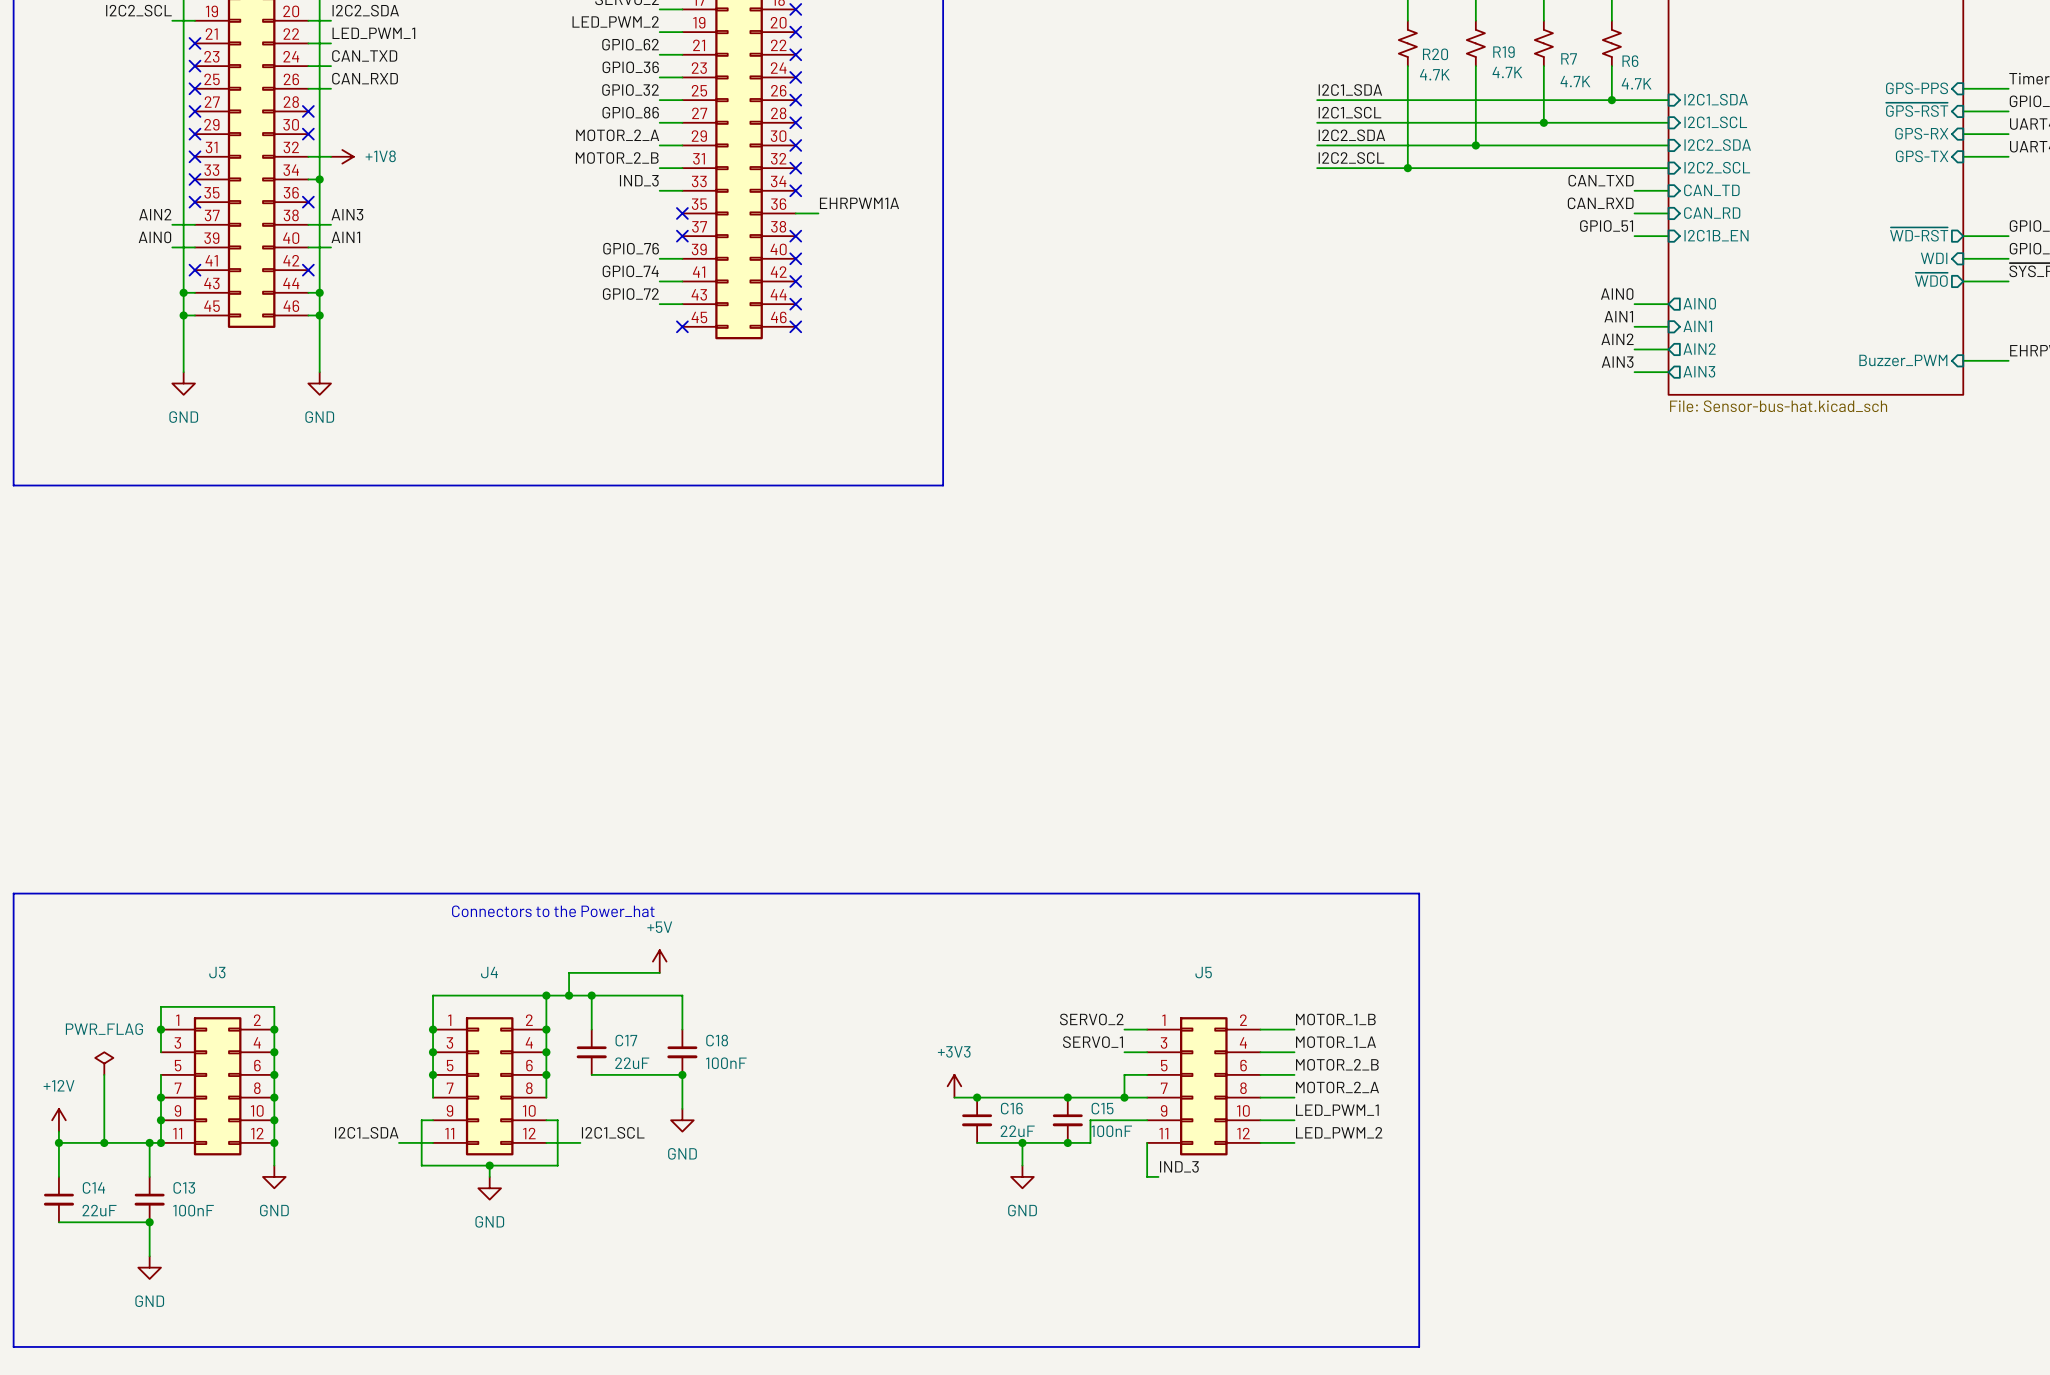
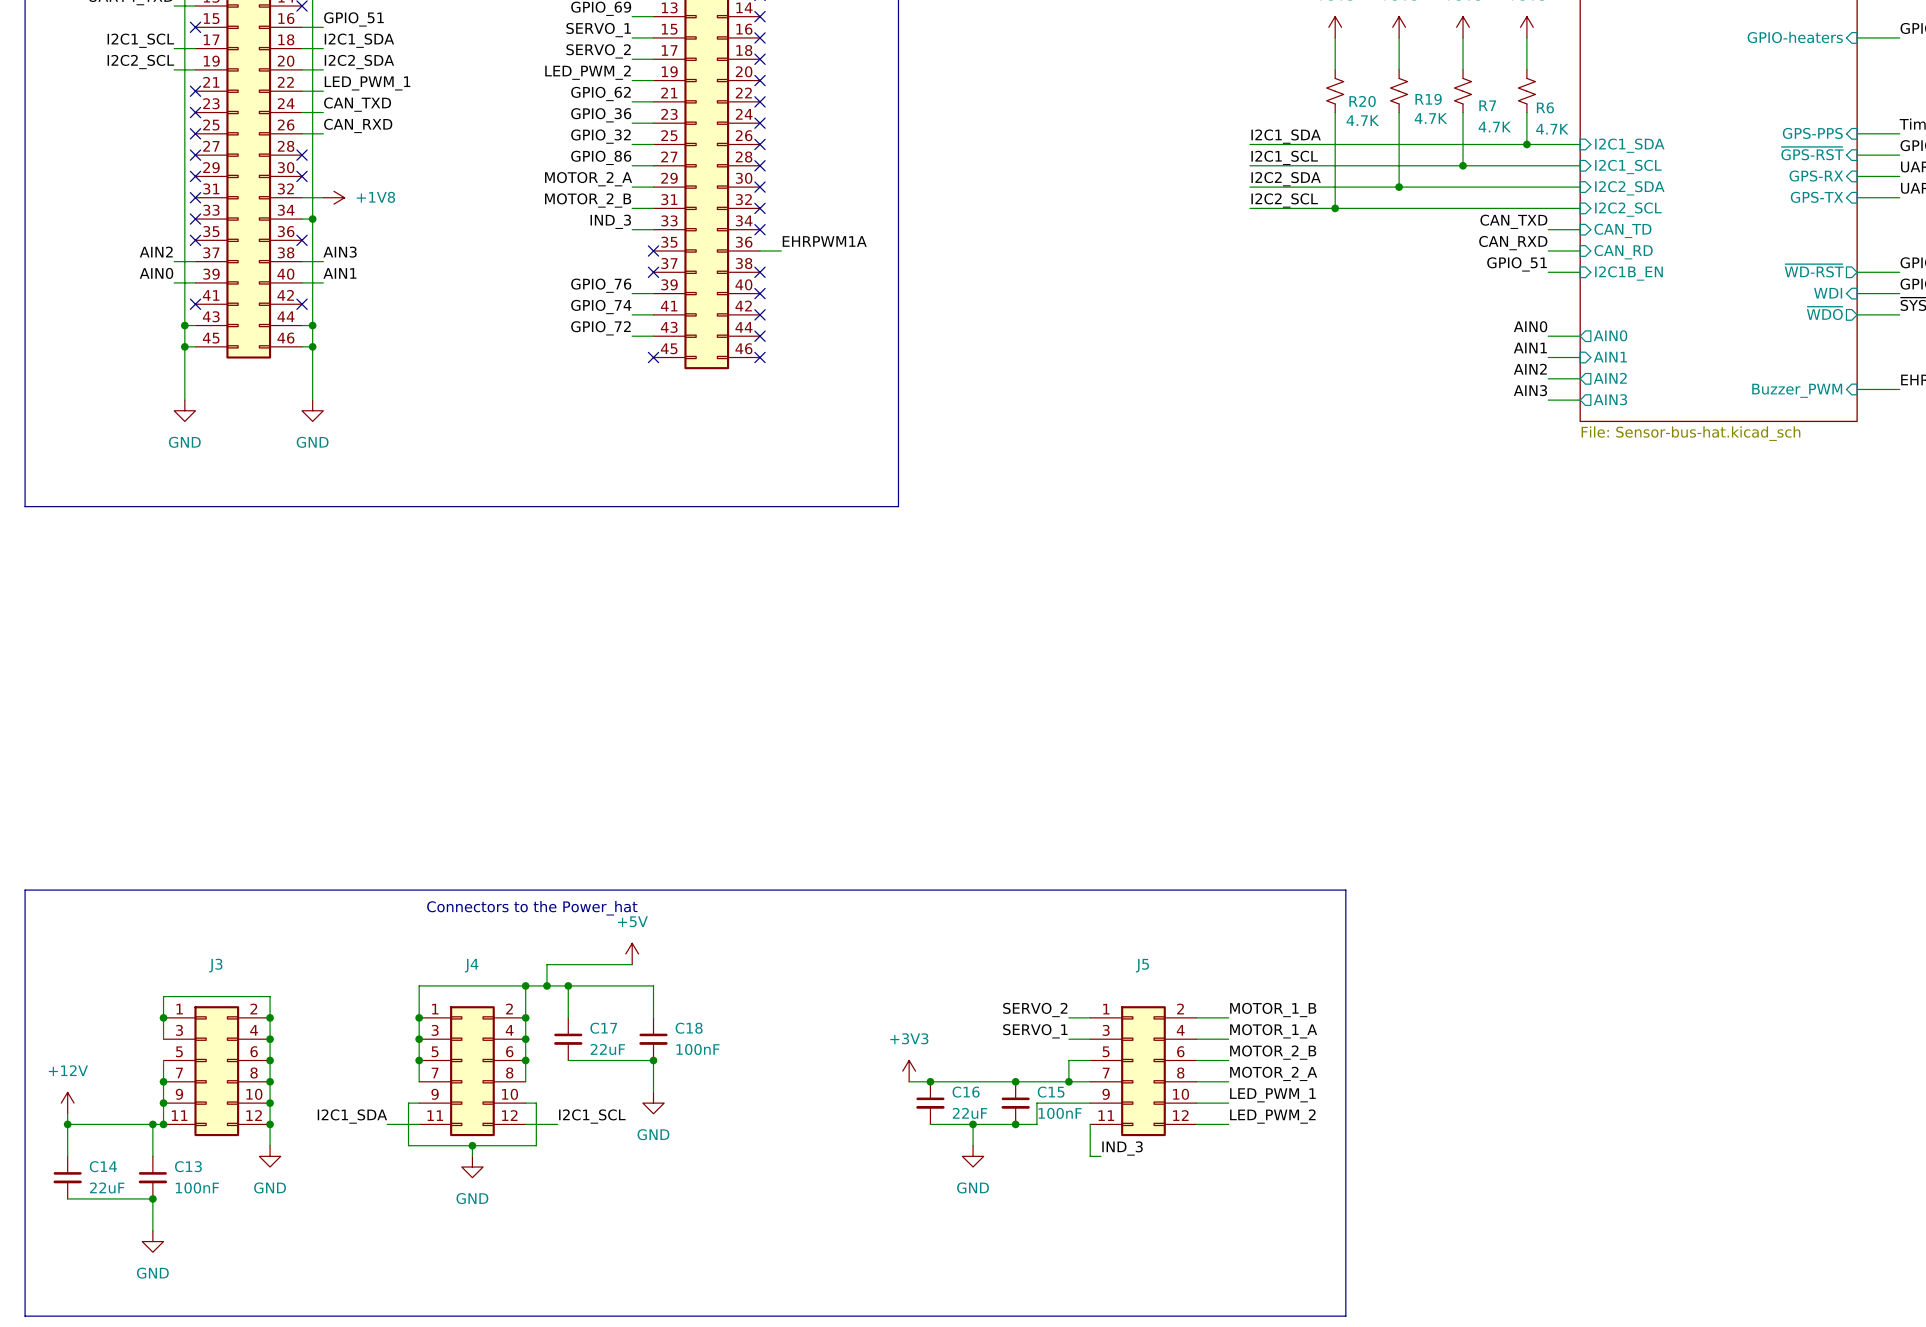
power symbol: PWR_FLAG (104, 1063) -> none
wire: (104, 1074) (104, 1142) -> none
junction: (104, 1142) -> none

